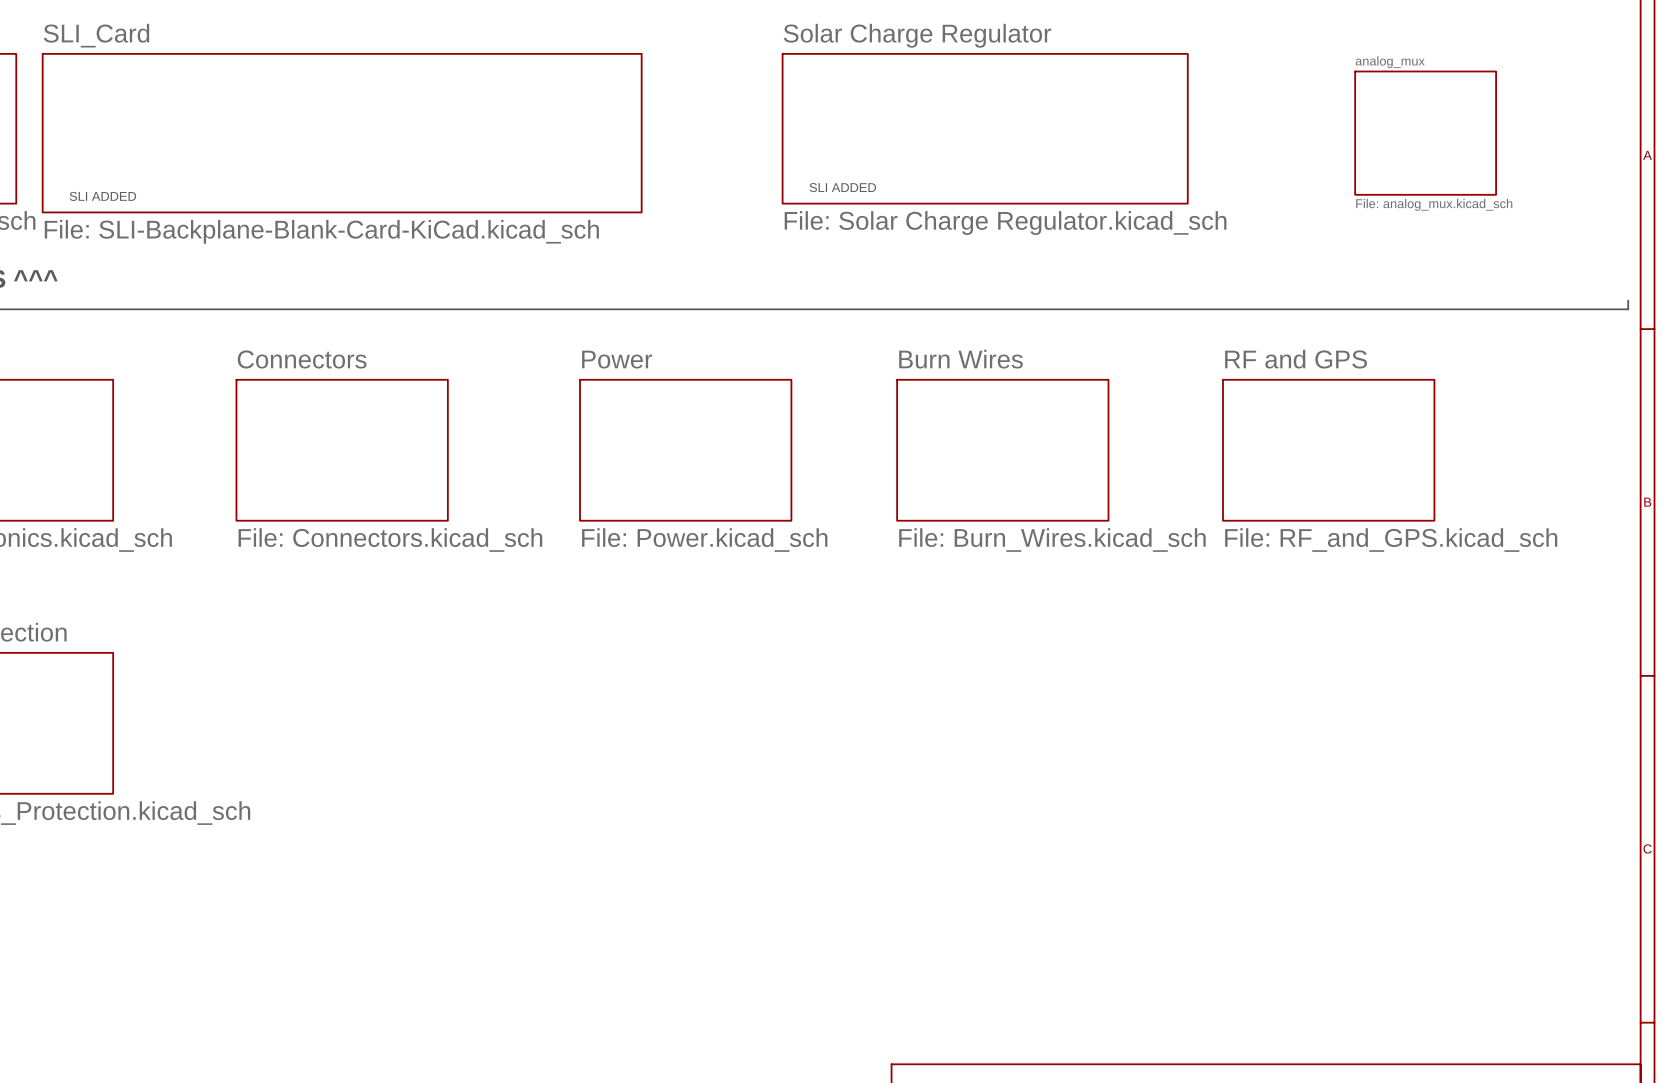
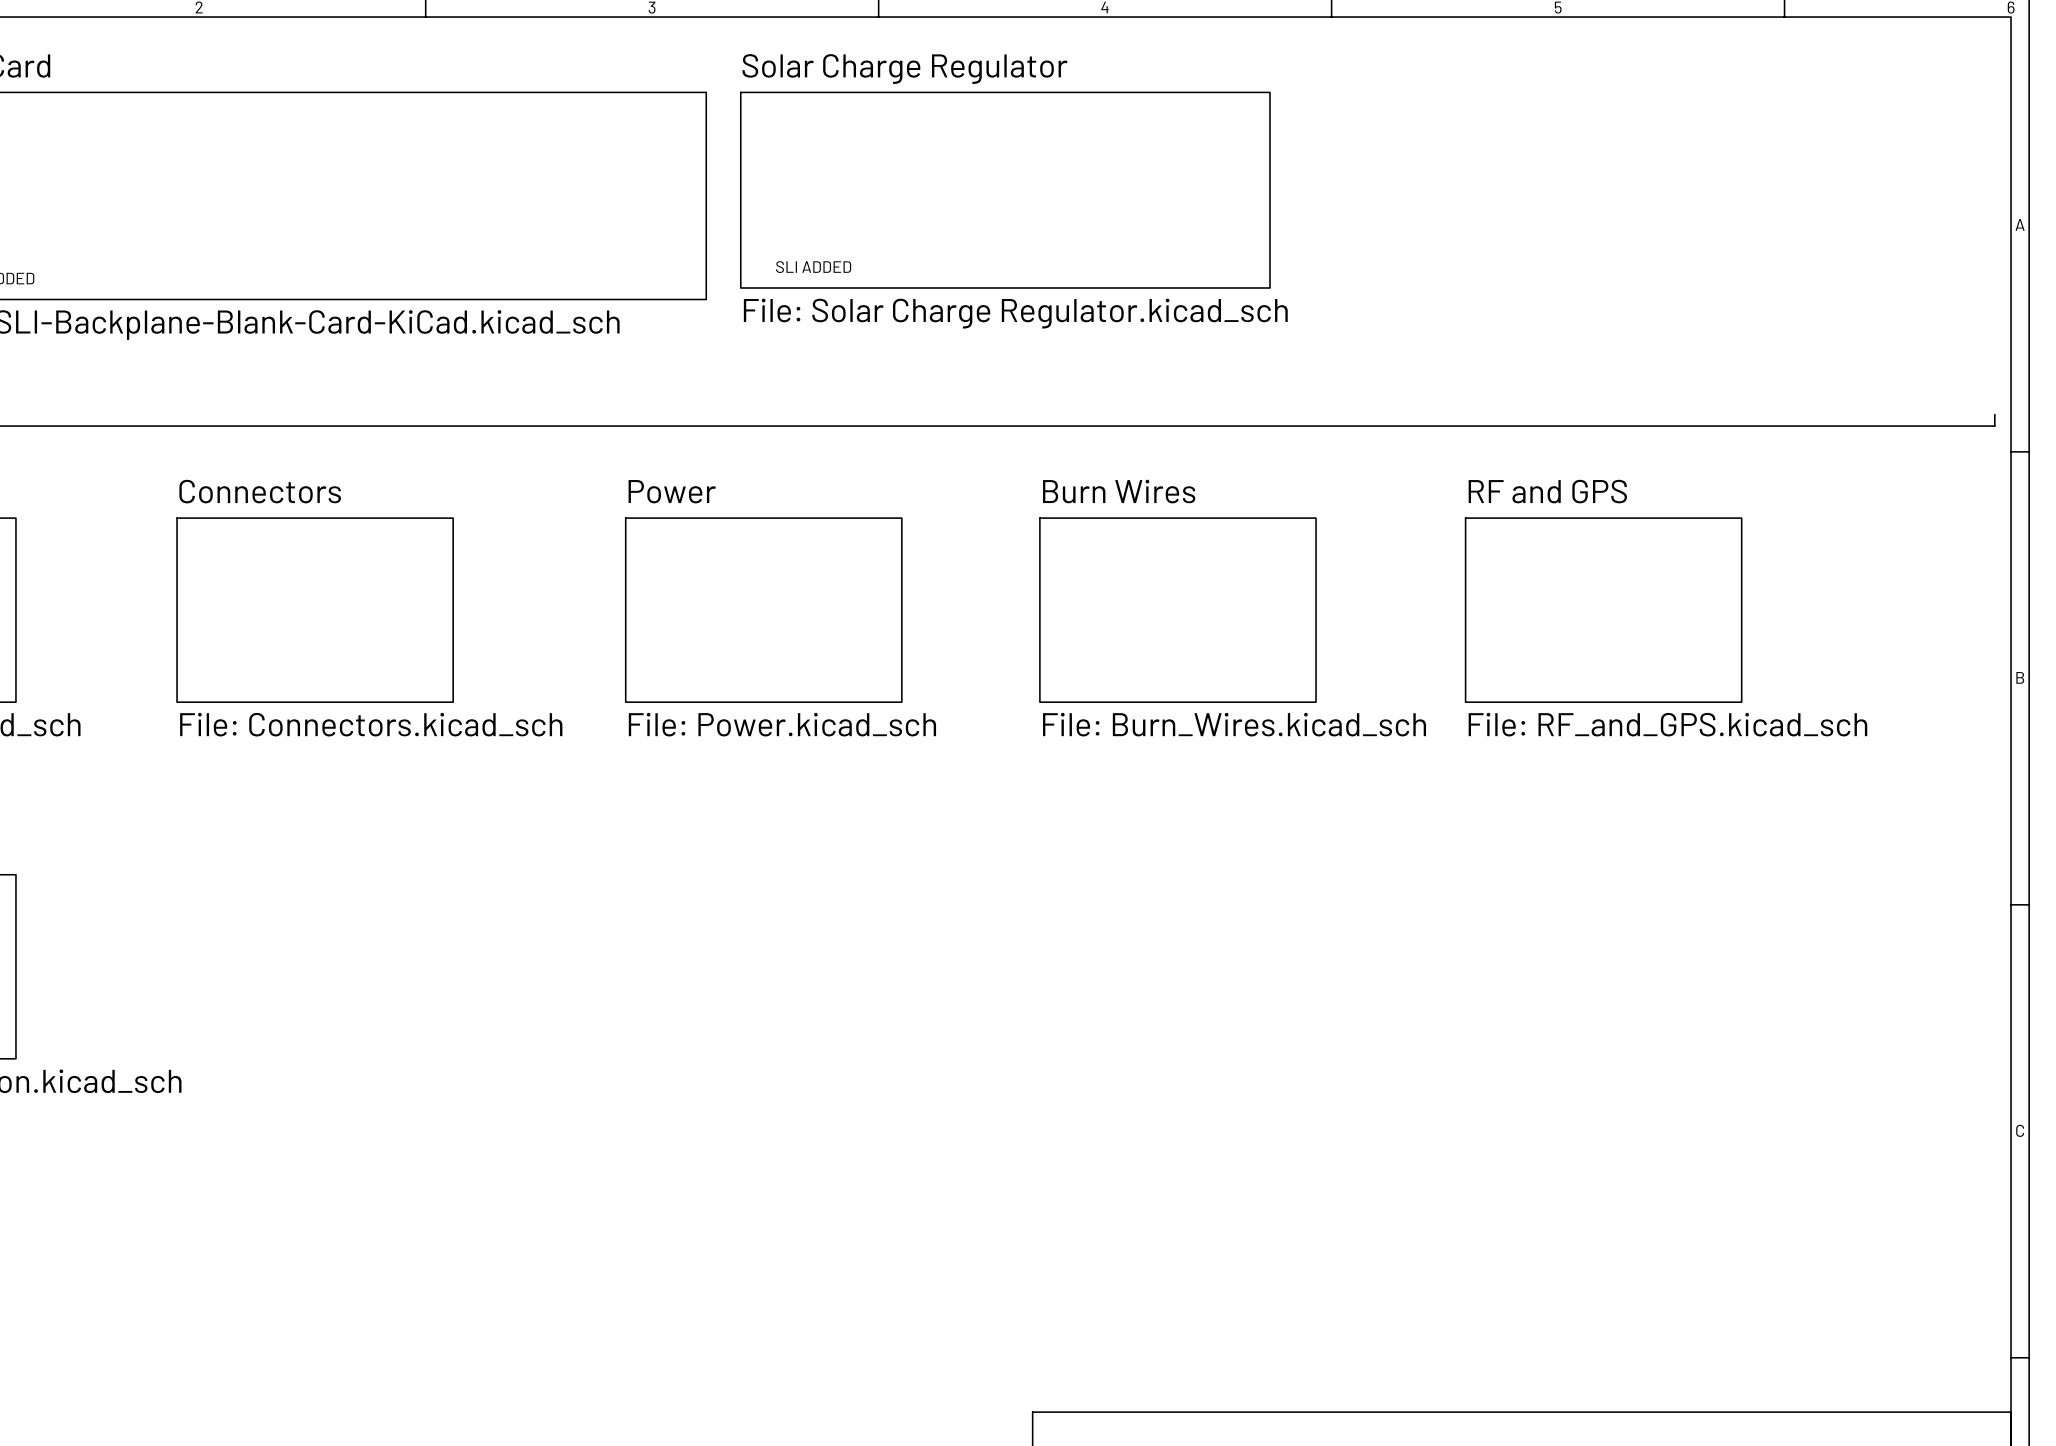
sheet Solar Charge Regulator position: (985, 128) -> (1005, 190)
sheet analog_mux: File: analog_mux.kicad_sch (1425, 133) -> none
text position: SLI ADDED (842, 187) -> SLI ADDED (813, 267)

